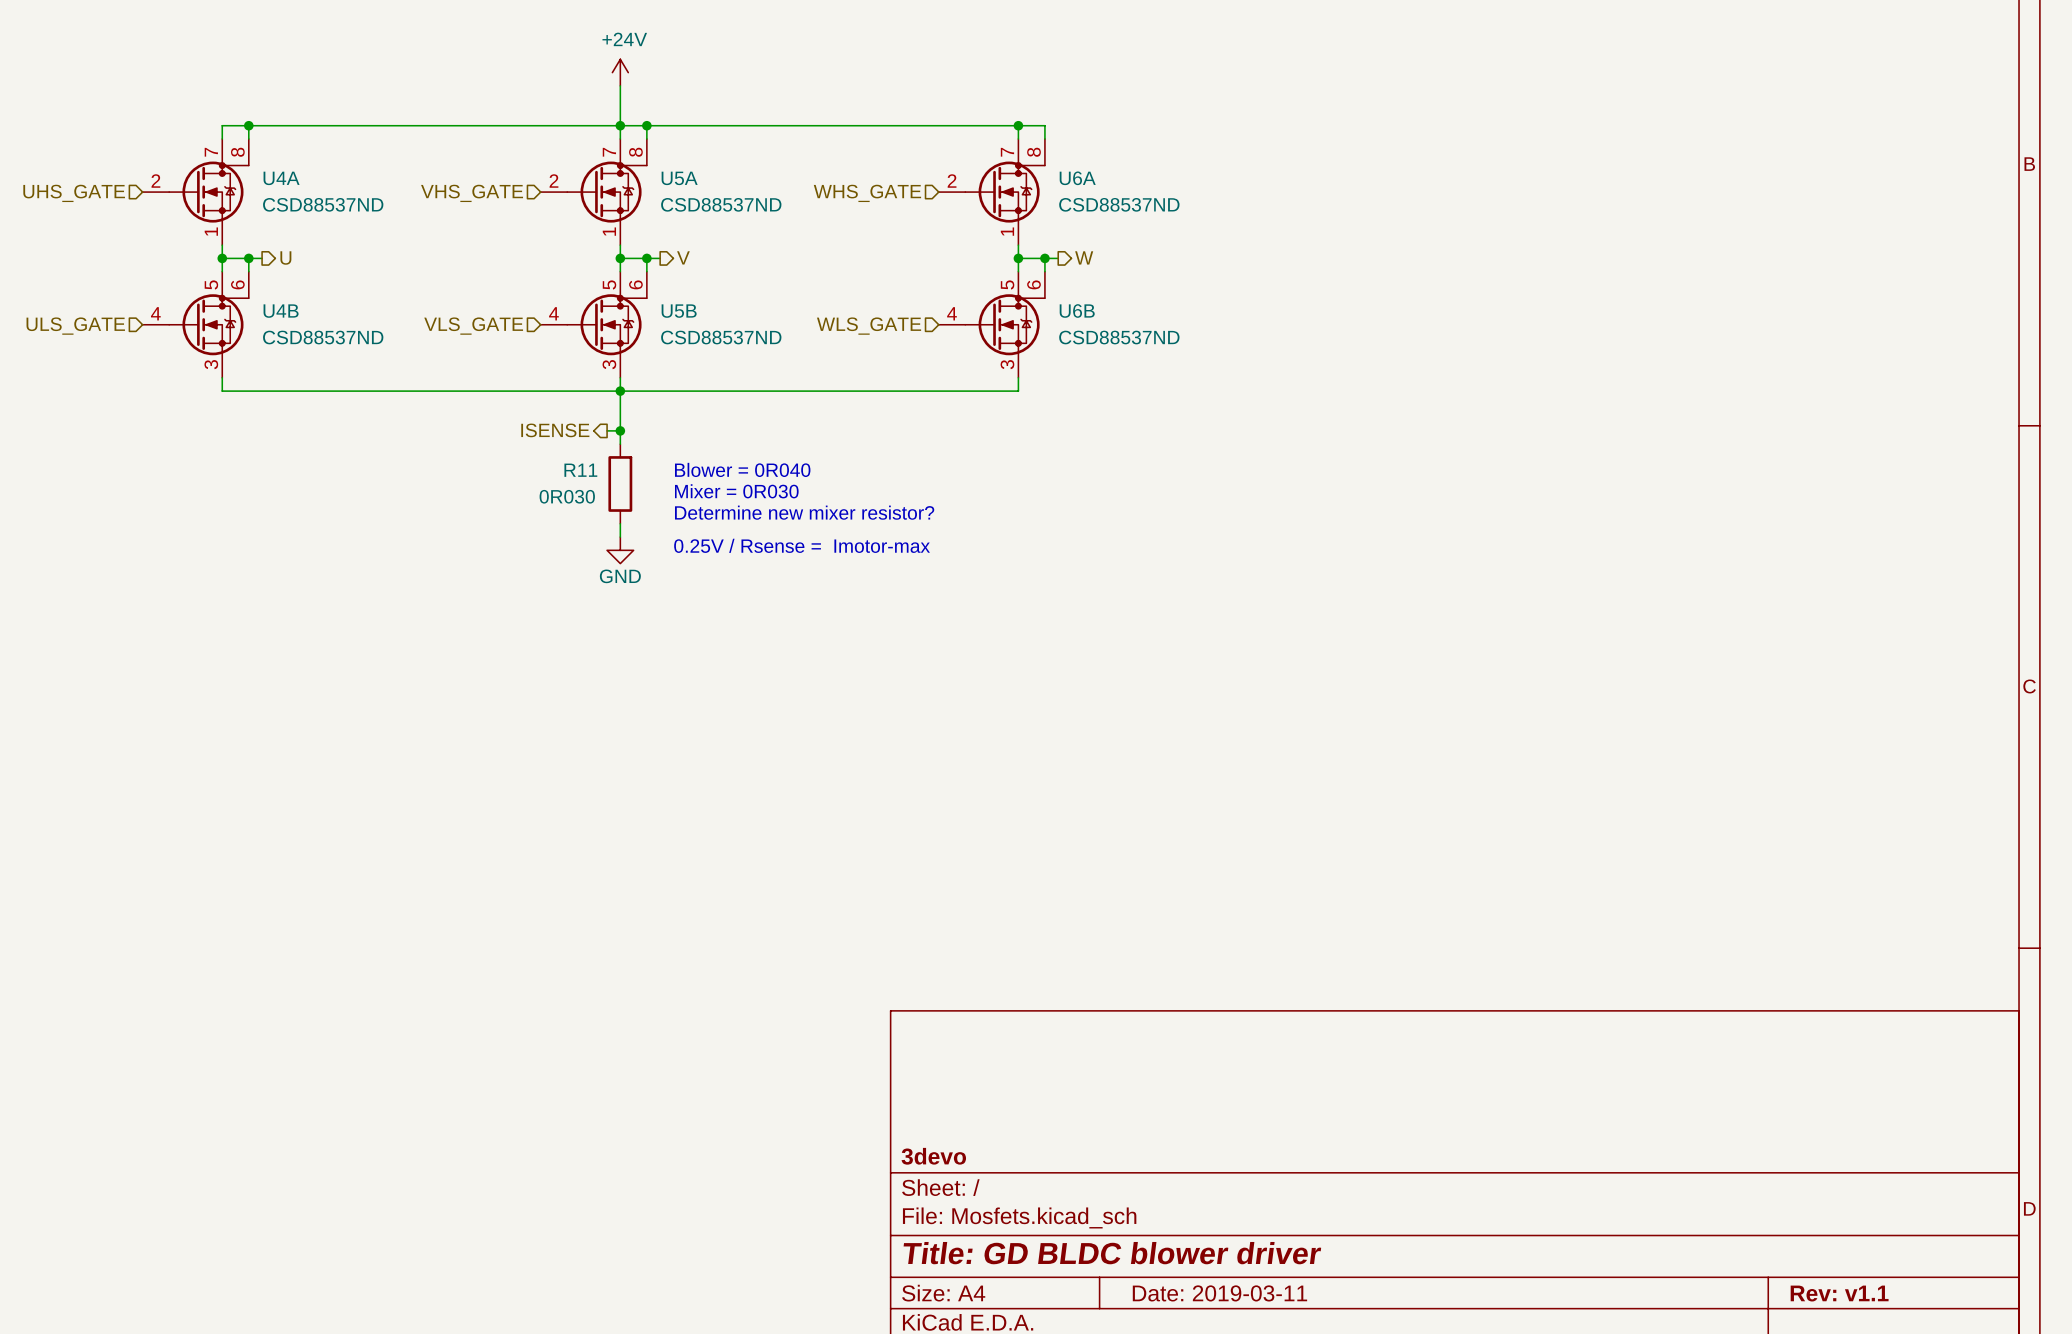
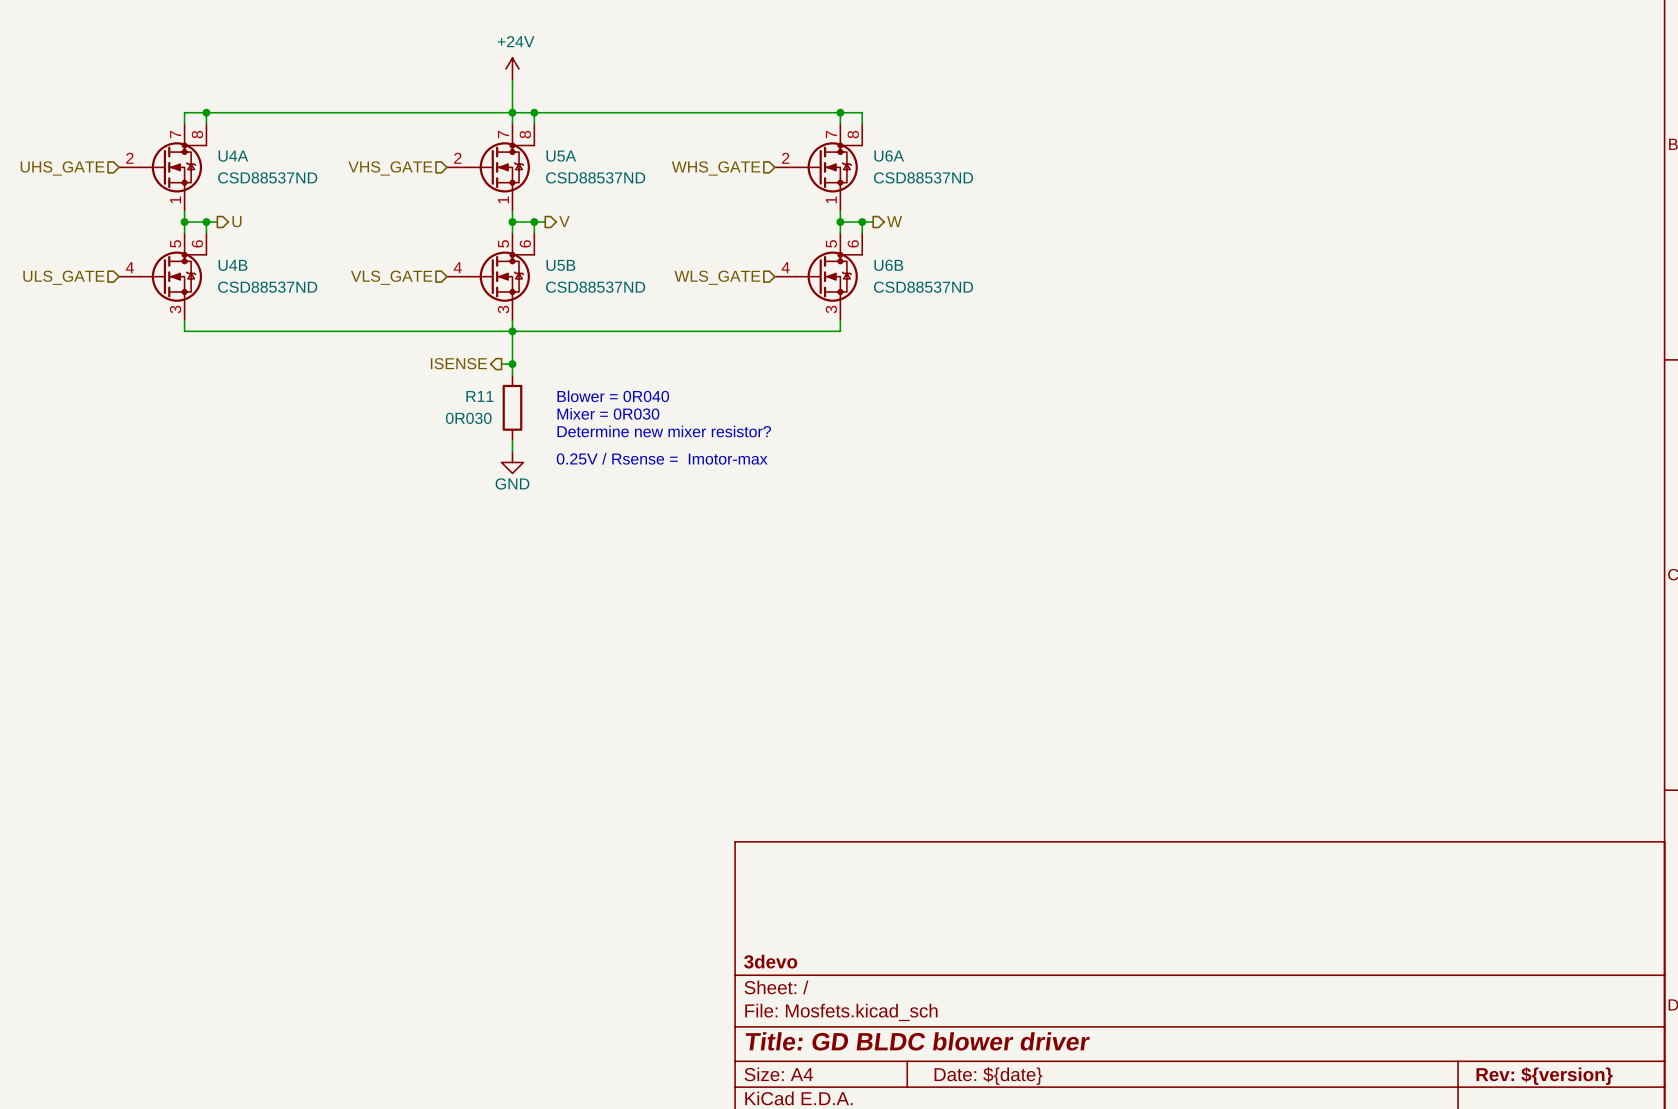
title block: Date: 2019-03-11 (1219, 1293) -> Date: ${date} (988, 1076)
title block: Rev: v1.1 (1839, 1293) -> Rev: ${version} (1544, 1076)

